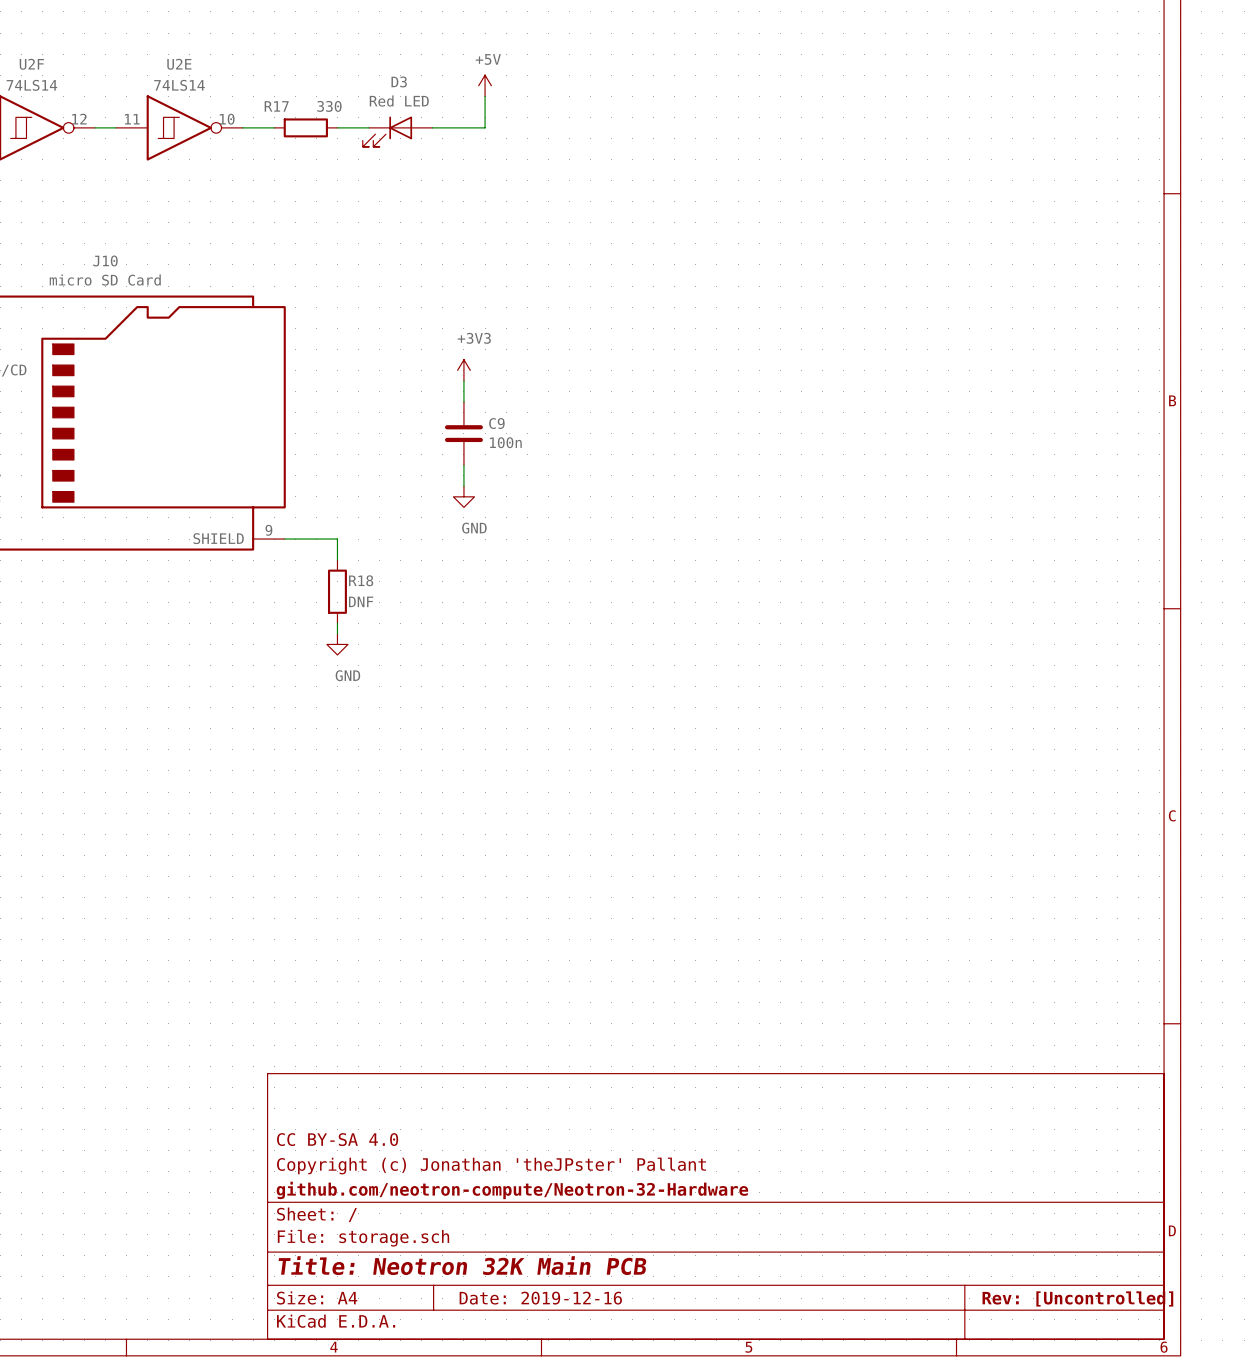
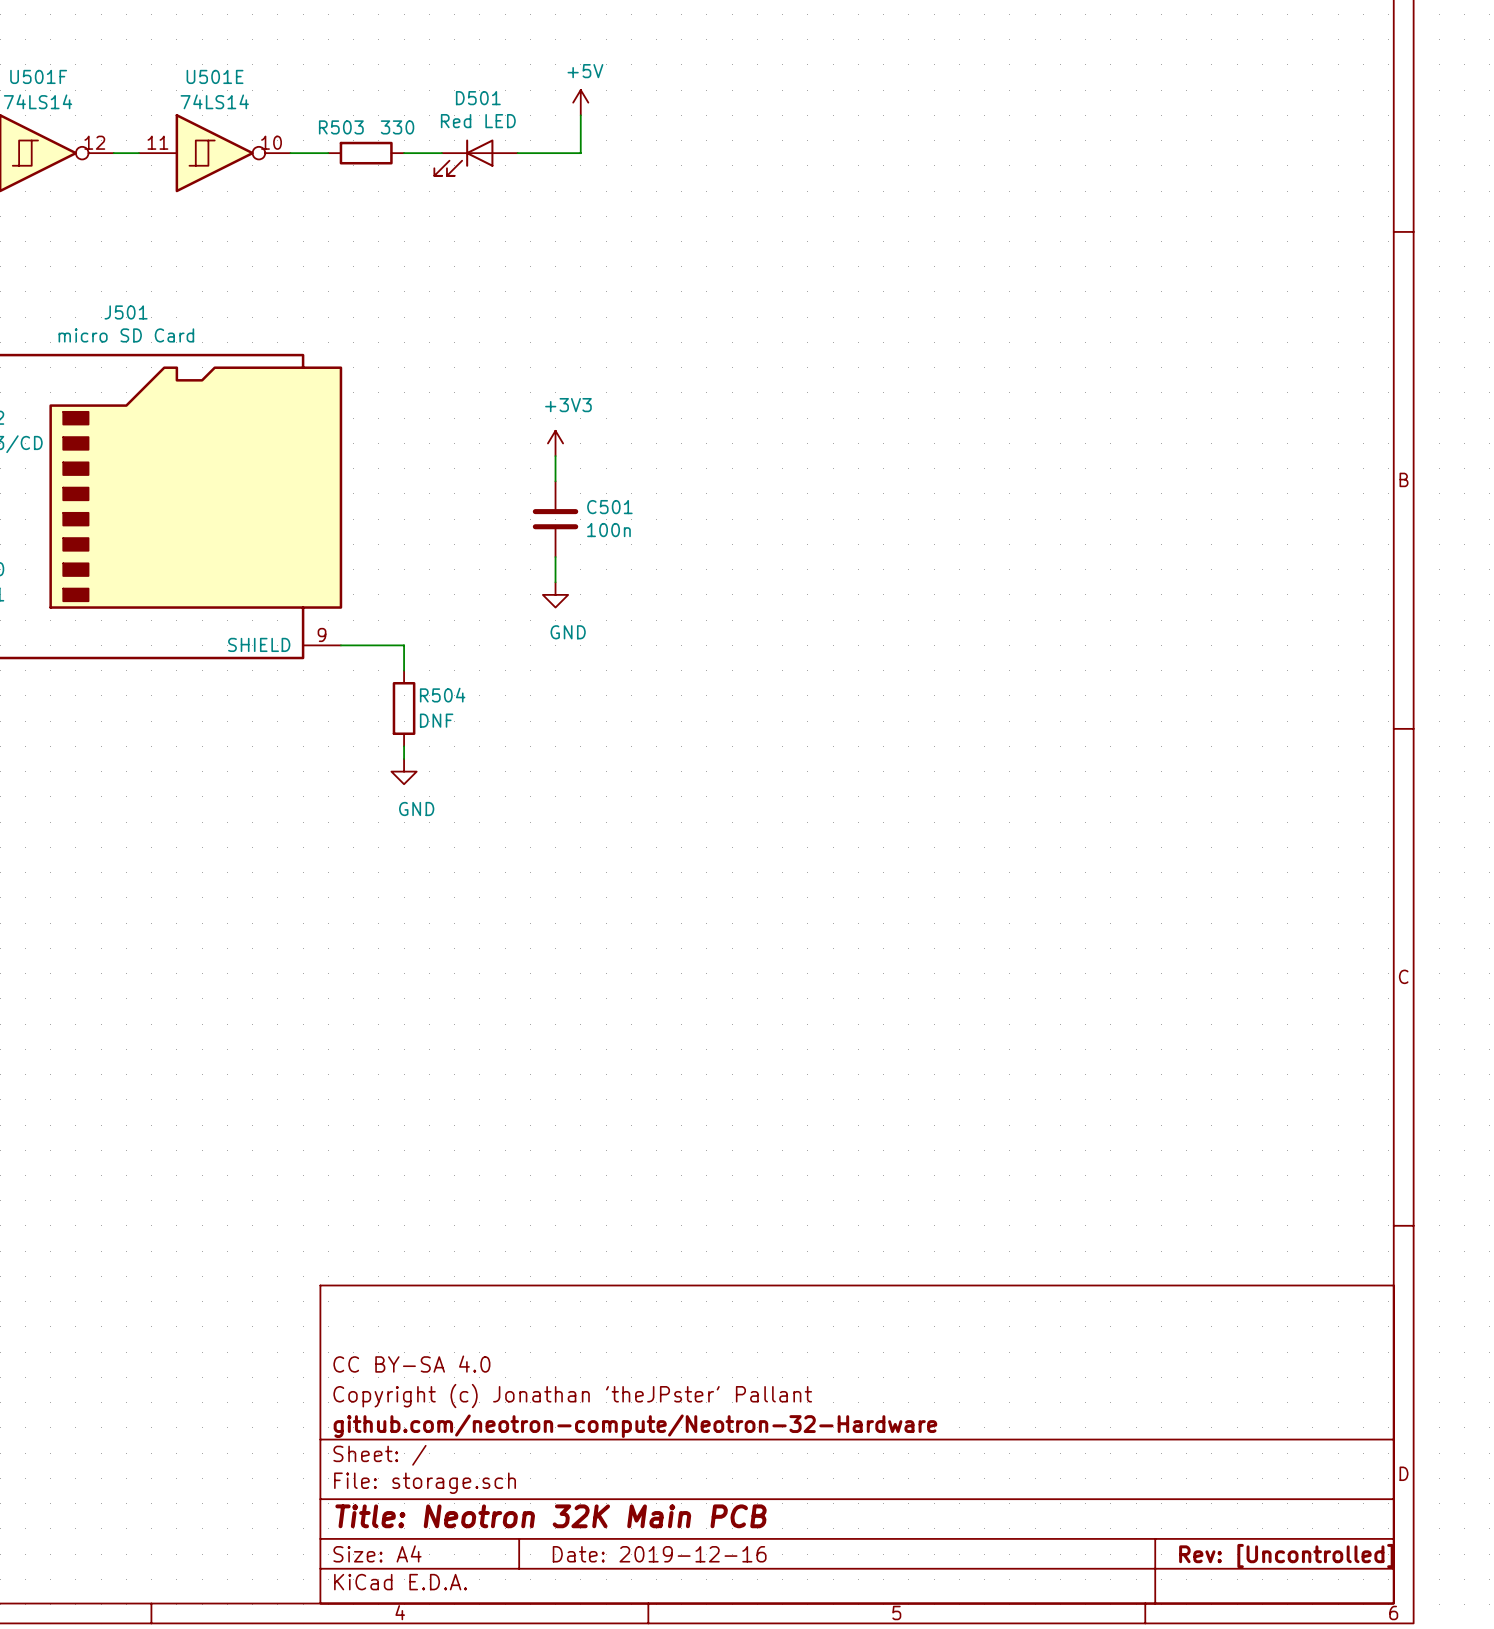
U2F name: U2F (31, 64) -> U501F (38, 76)
U2E name: U2E (179, 64) -> U501E (215, 76)
D3 name: D3 (399, 81) -> D501 (478, 98)
R17 name: R17 (276, 106) -> R503 (341, 127)
J10 name: J10 (105, 260) -> J501 (126, 312)
C9 name: C9 (496, 423) -> C501 (609, 507)
R18 name: R18 (361, 580) -> R504 (442, 695)

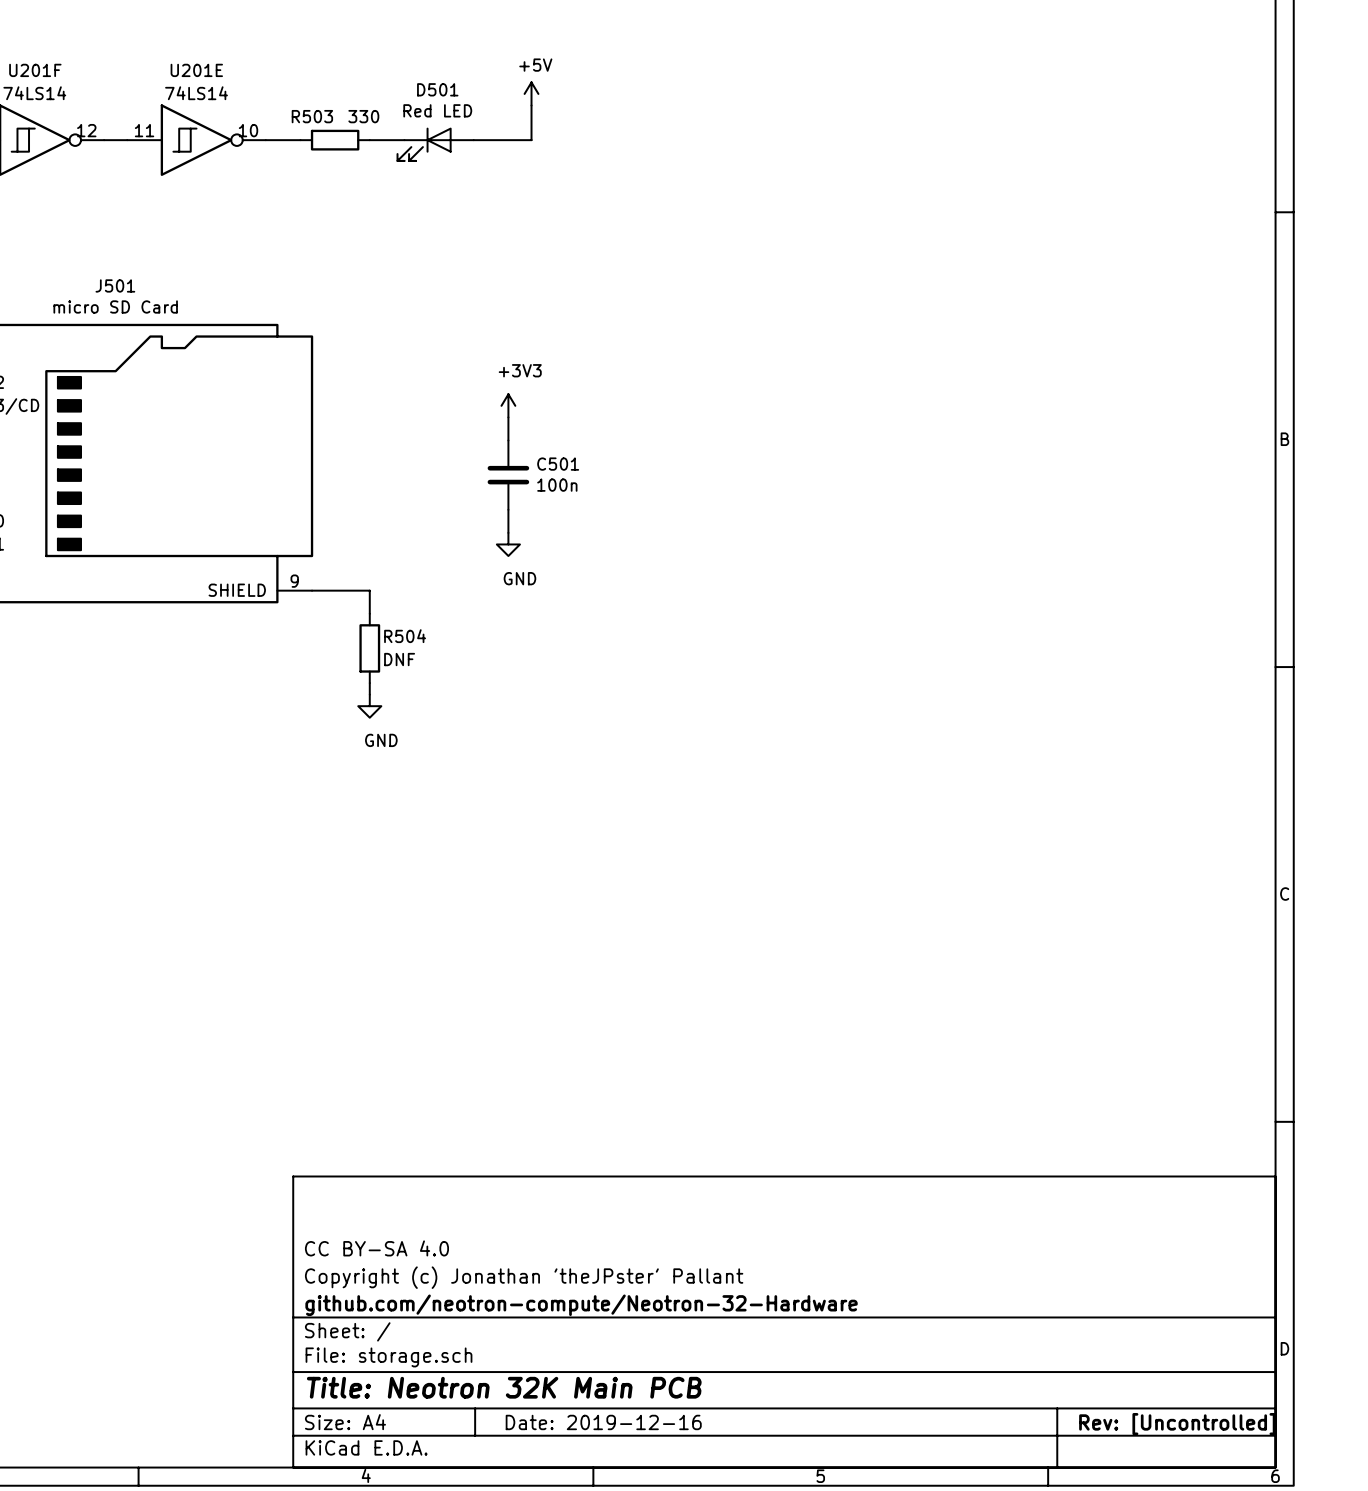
U501F name: U501F (38, 76) -> U201F (35, 70)
U501E name: U501E (215, 76) -> U201E (196, 70)

